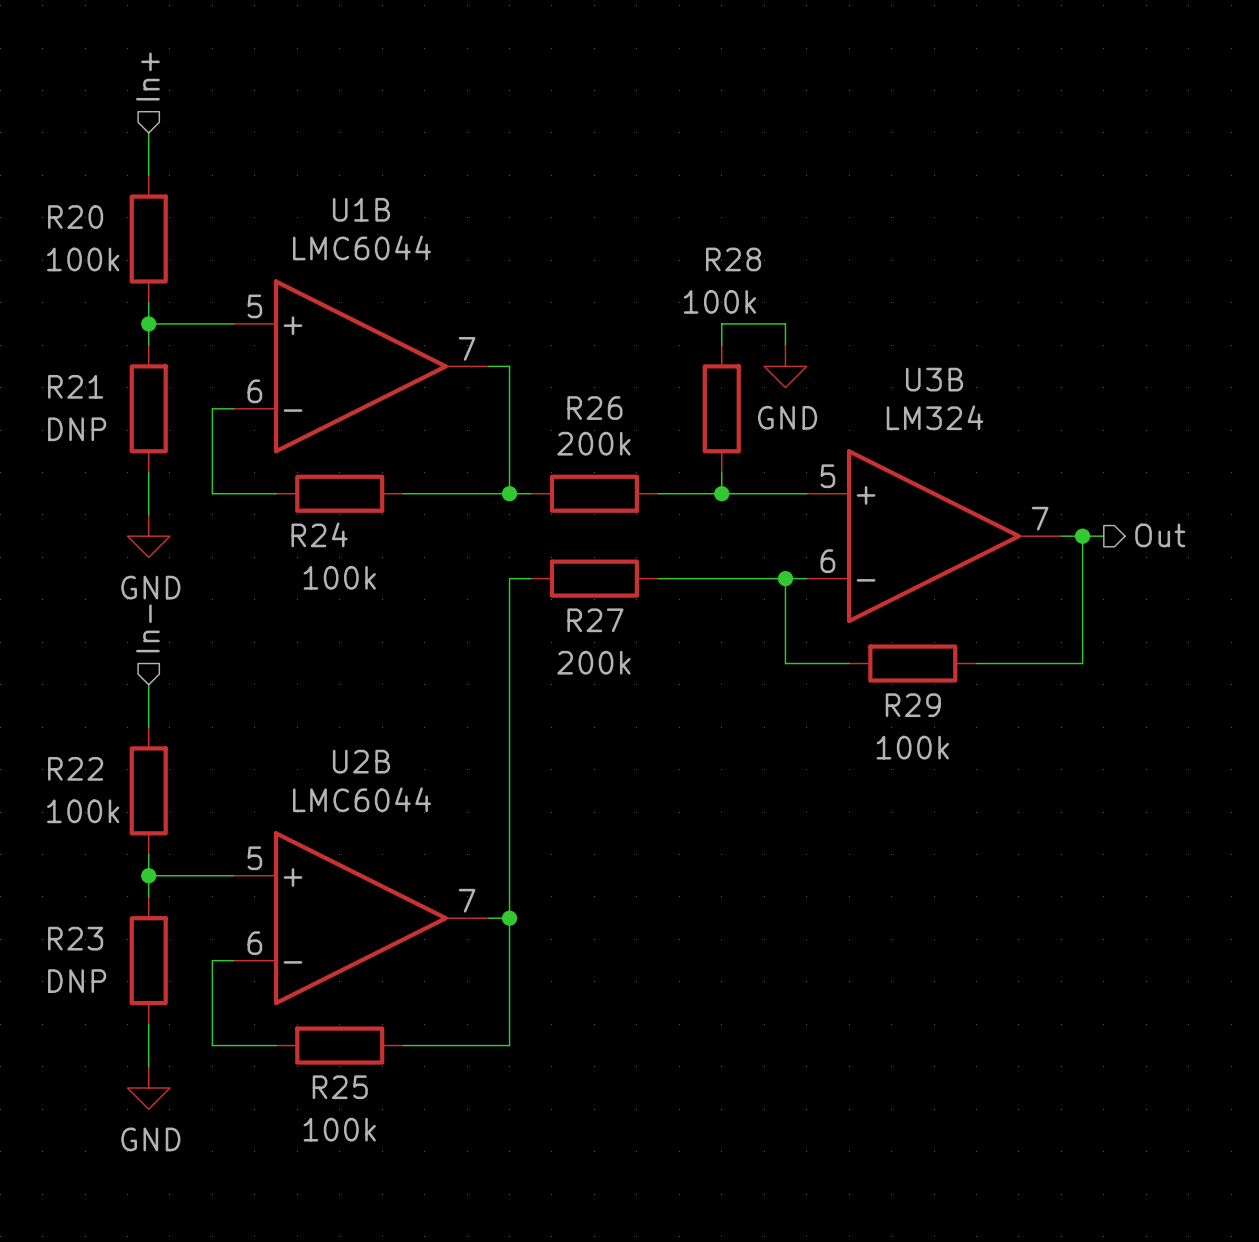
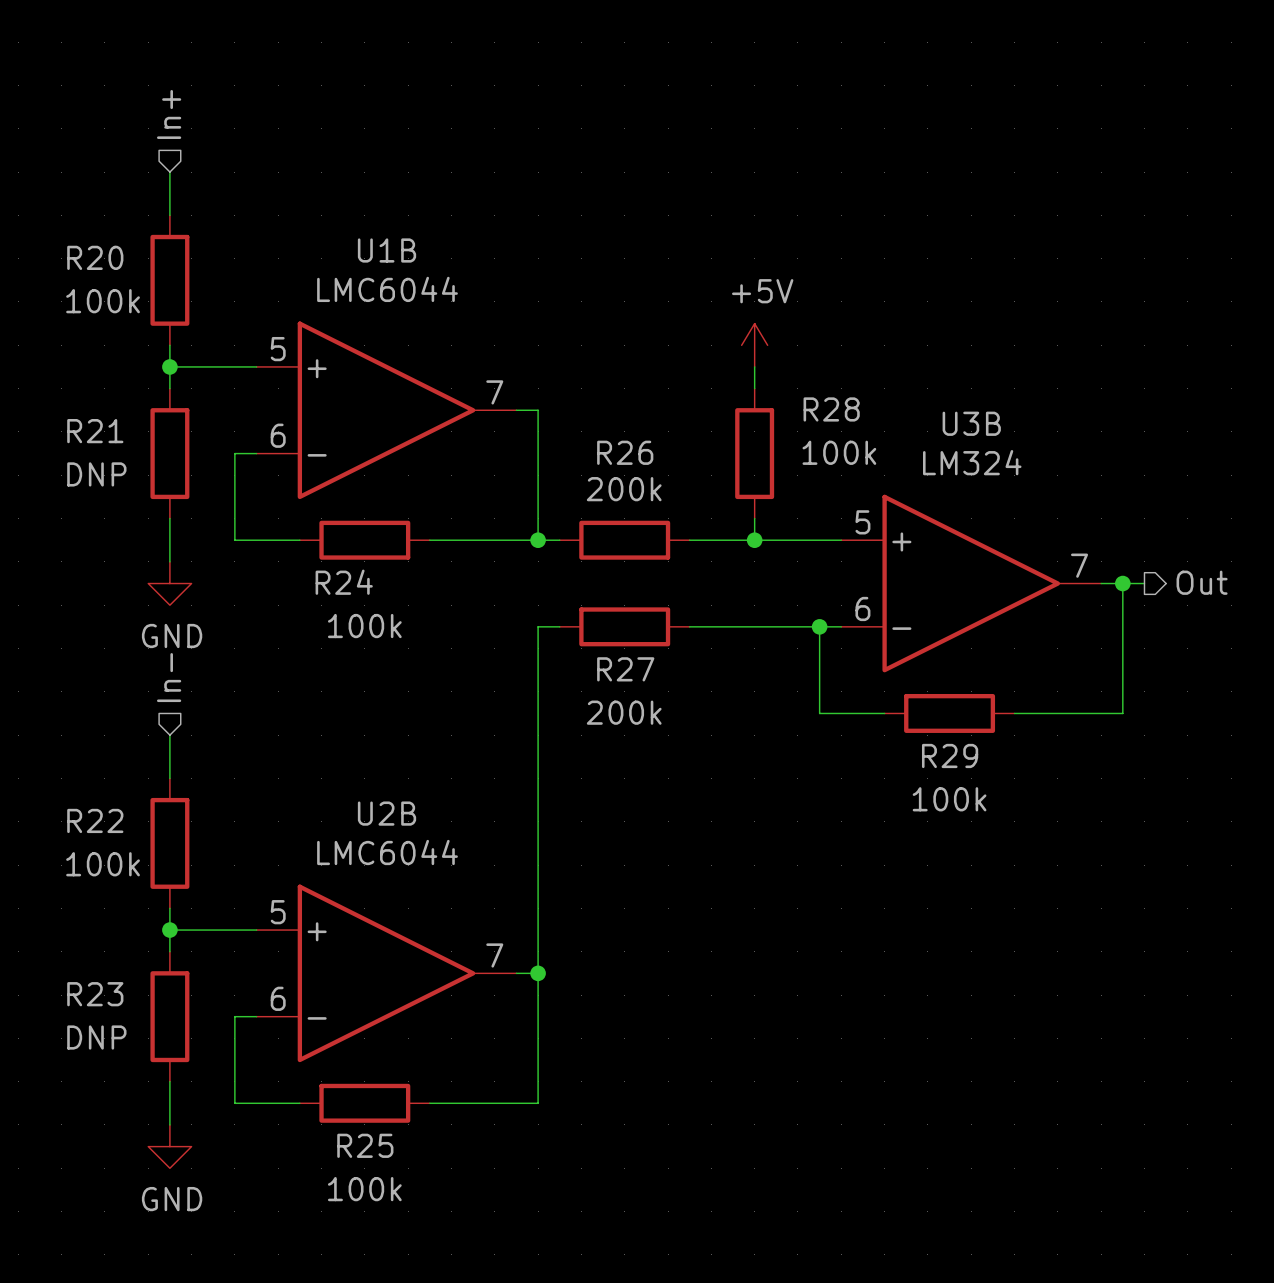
R28 name position: R28 (733, 259) -> R28 (831, 409)
R28 value position: 100k (719, 301) -> 100k (839, 452)
power symbol: none -> +5V (754, 345)
wire: (721, 323) (785, 323) (785, 345) -> none
power symbol: GND (785, 366) -> none

